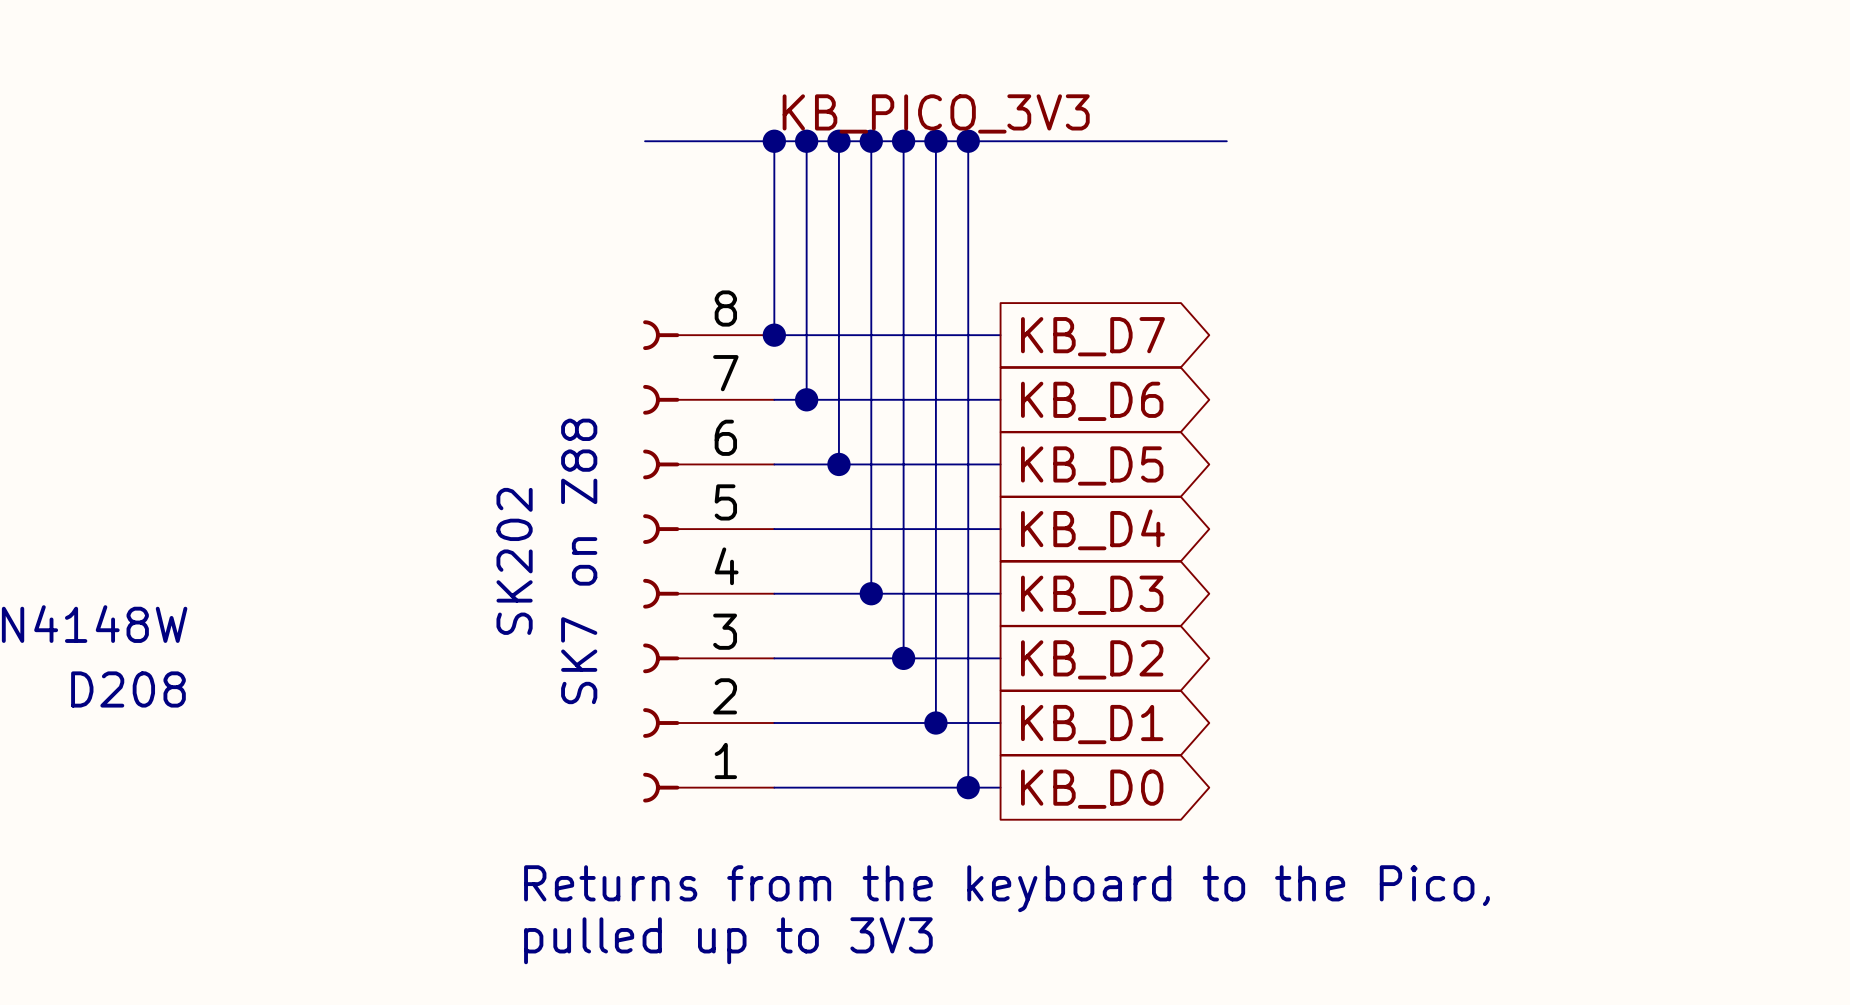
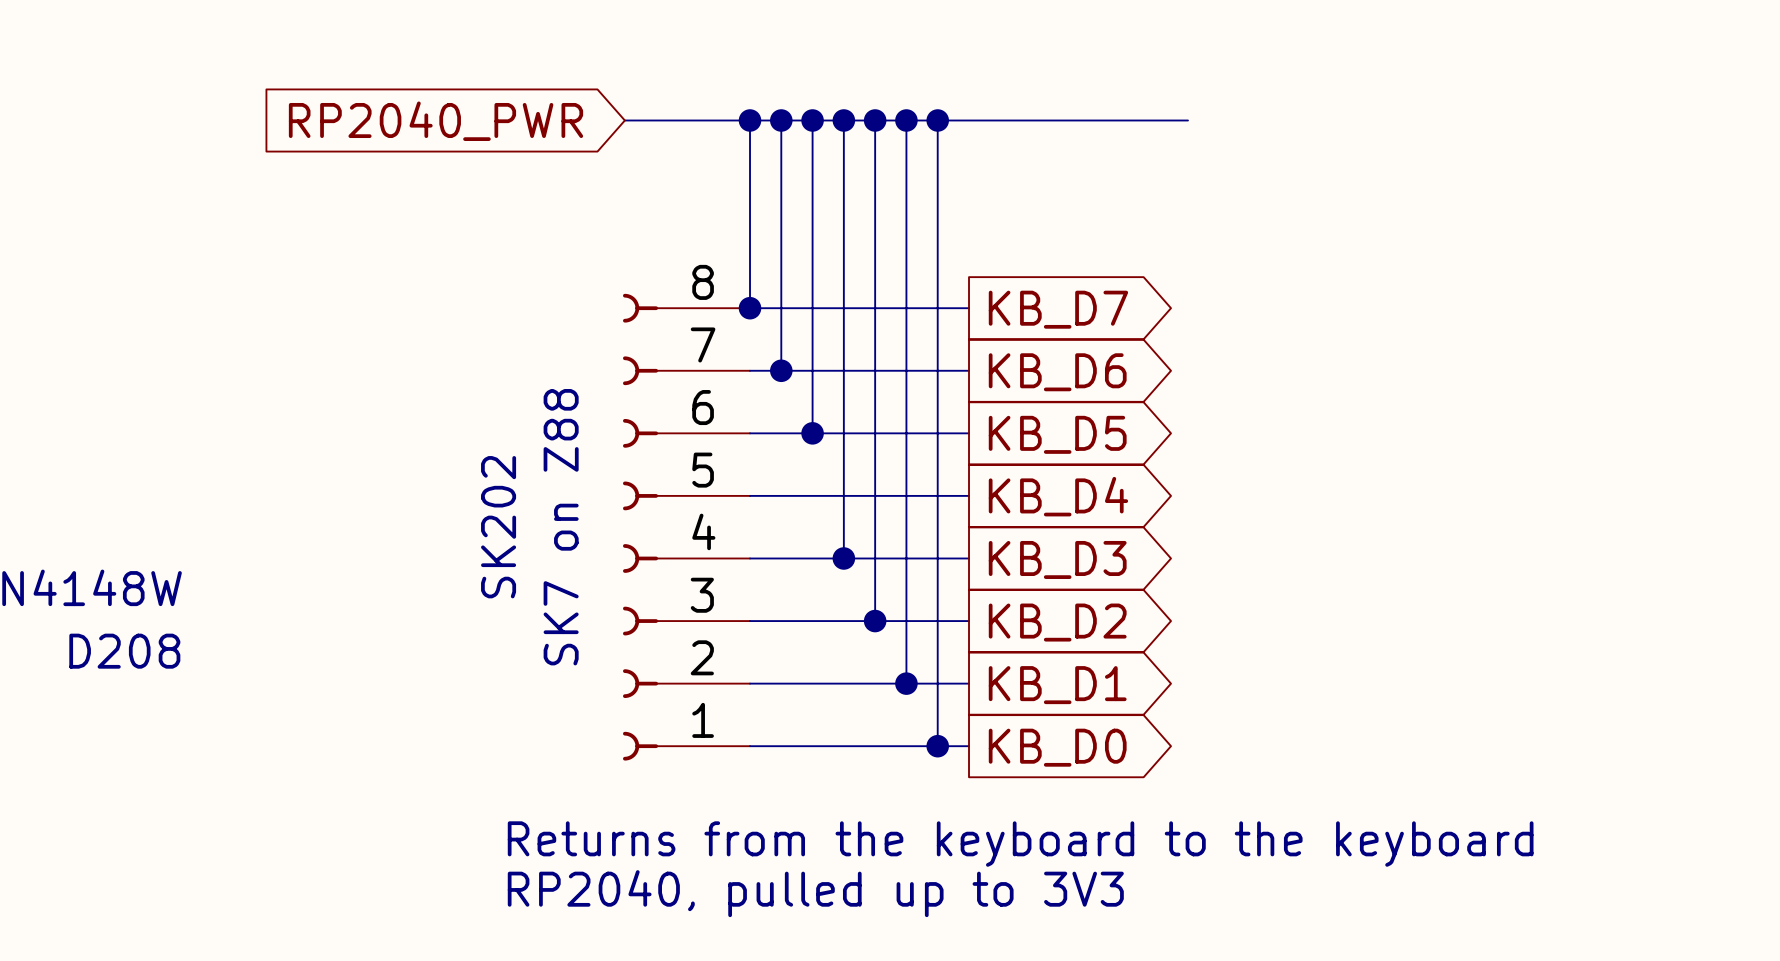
label: KB_PICO_3V3 (936, 113) -> none
global label: none -> RP2040_PWR (435, 121)
text: Returns from the keyboard to the Pico, (1006, 888) -> Returns from the keyboard to the keyboard (1020, 844)
text: pulled up to 3V3 (728, 940) -> RP2040, pulled up to 3V3 (815, 893)

